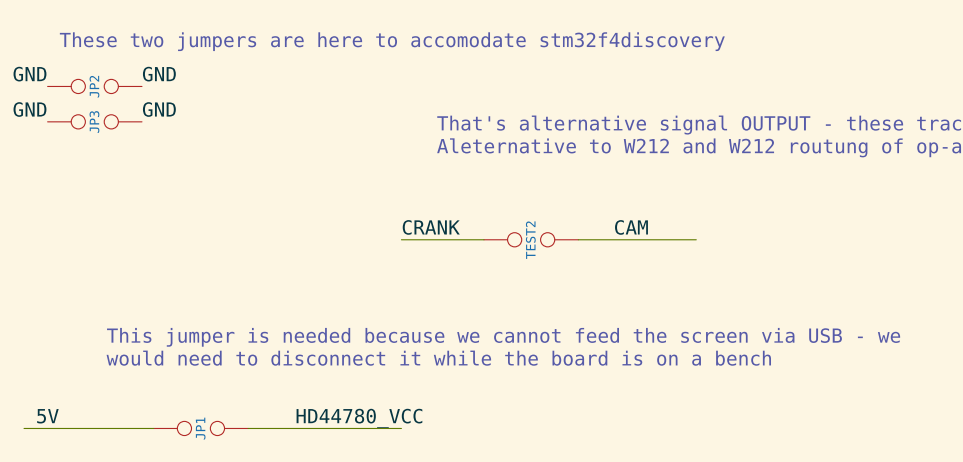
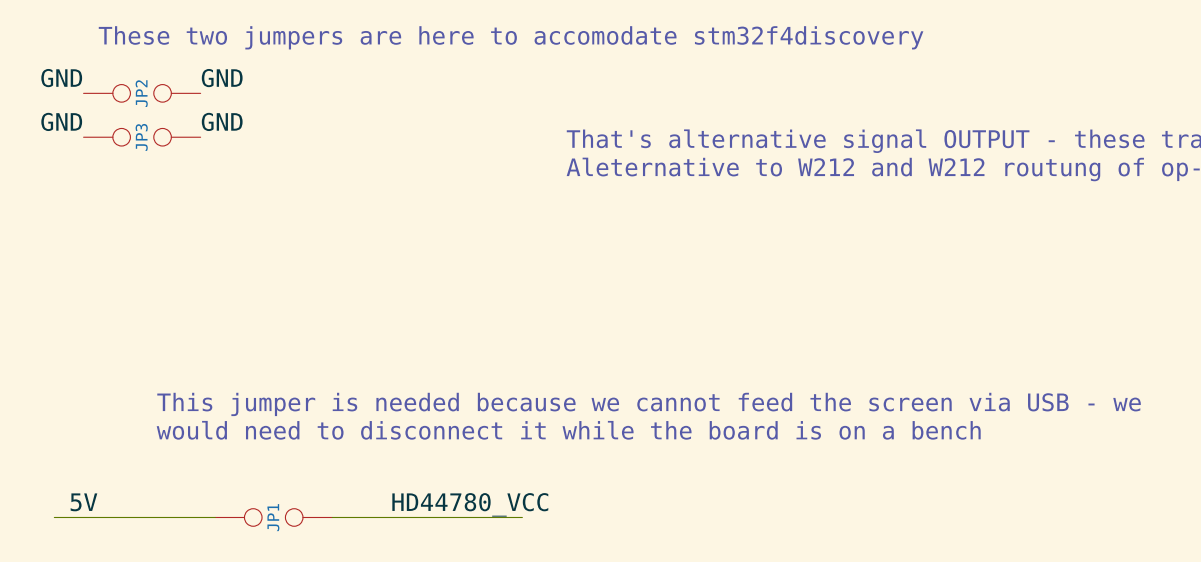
label: CRANK (431, 227) -> none
label: CAM (631, 227) -> none
wire: (401, 239) (483, 239) -> none
TEST2: (531, 239) -> none
wire: (578, 239) (696, 239) -> none

